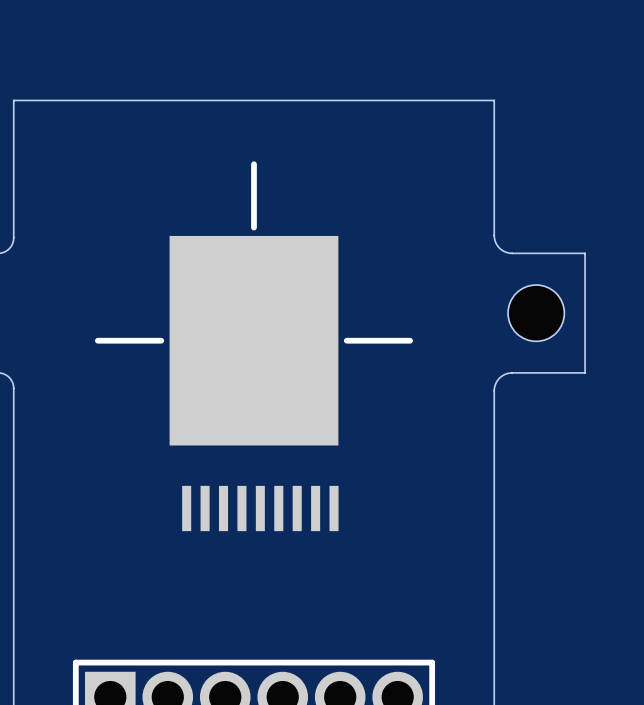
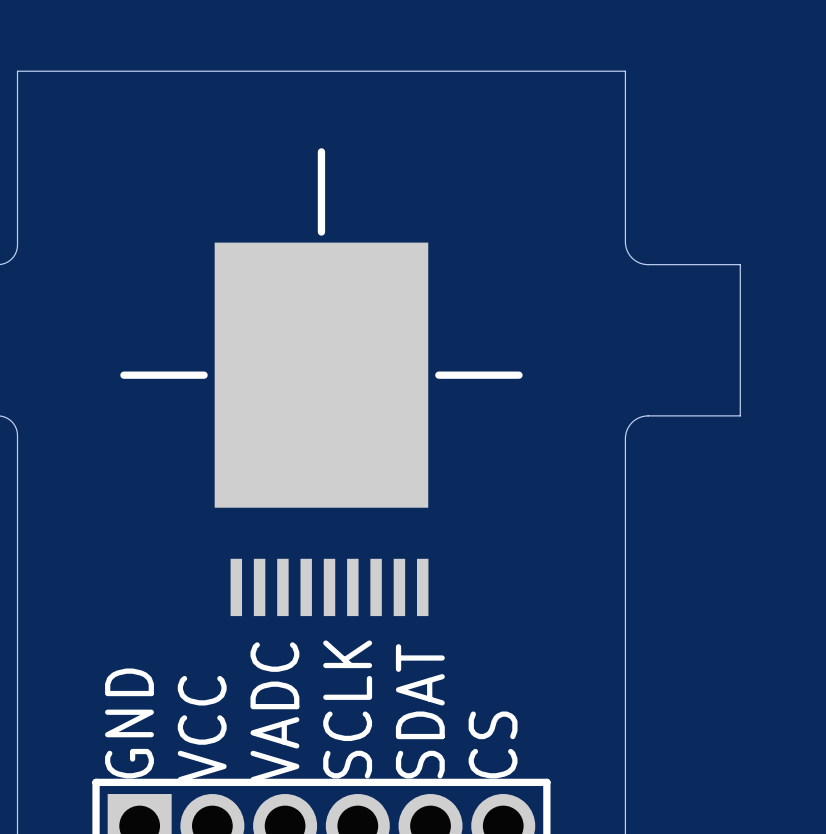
hole: (536, 313) -> none
text: none -> VADC (274, 712)
text: none -> SDAT (420, 711)
text: none -> SCLK (347, 709)
text: none -> GND (129, 723)
text: none -> VCC (202, 729)
text: none -> CS (493, 744)

